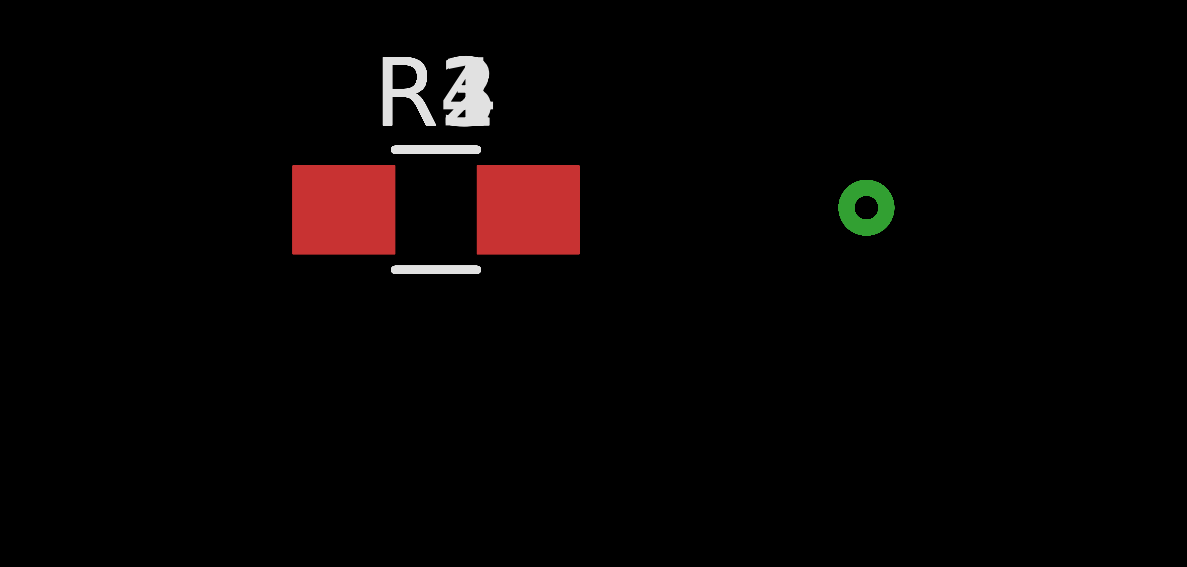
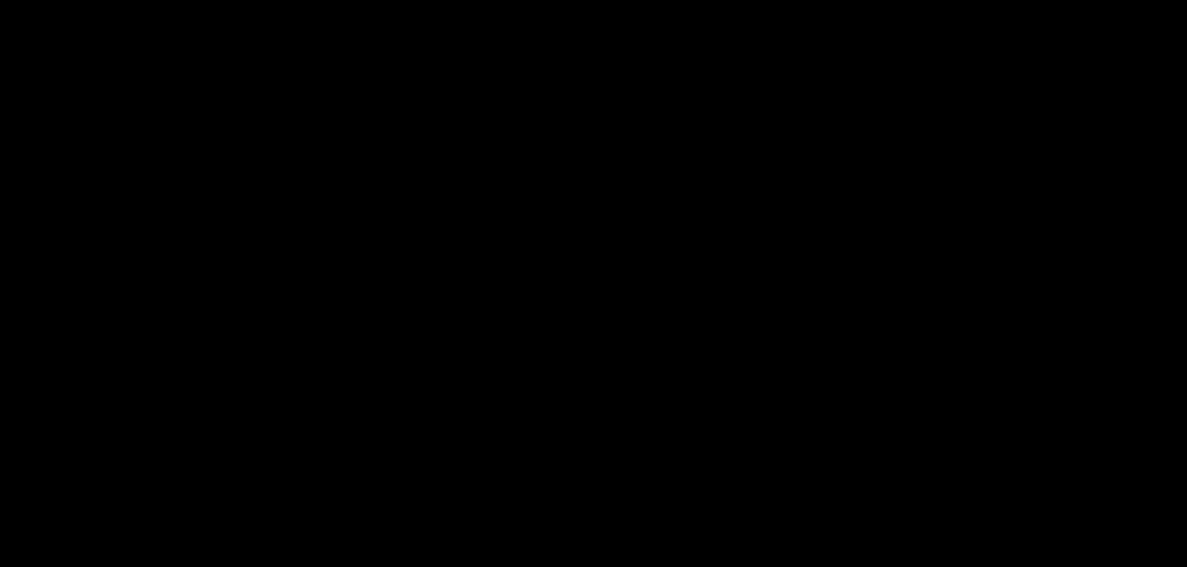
part: (866, 207) -> none
part: (436, 209) -> none
part: (436, 209) -> none
part: (436, 209) -> none
part: (436, 209) -> none

